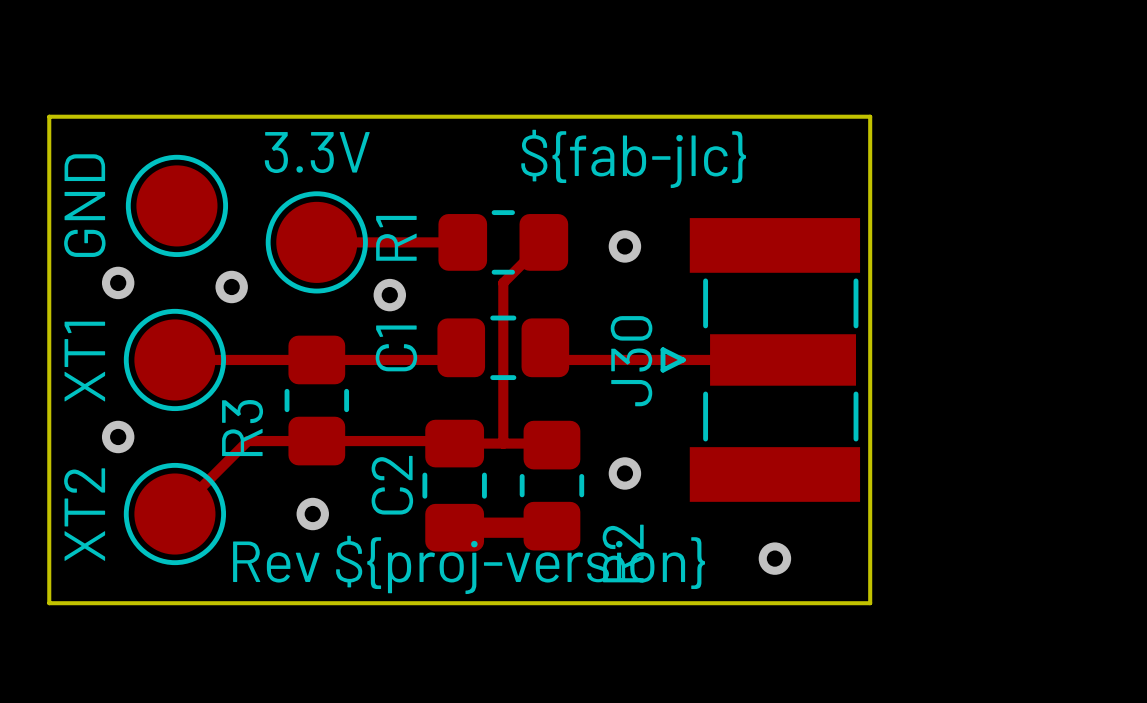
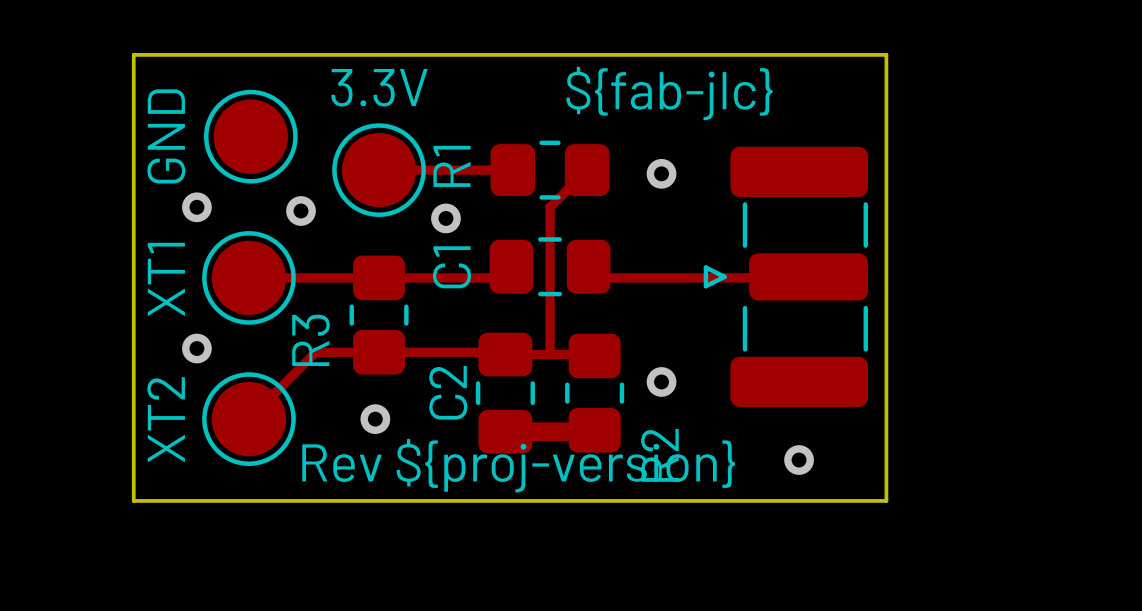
part: none -> (785, 276)
J30: (760, 359) -> none

